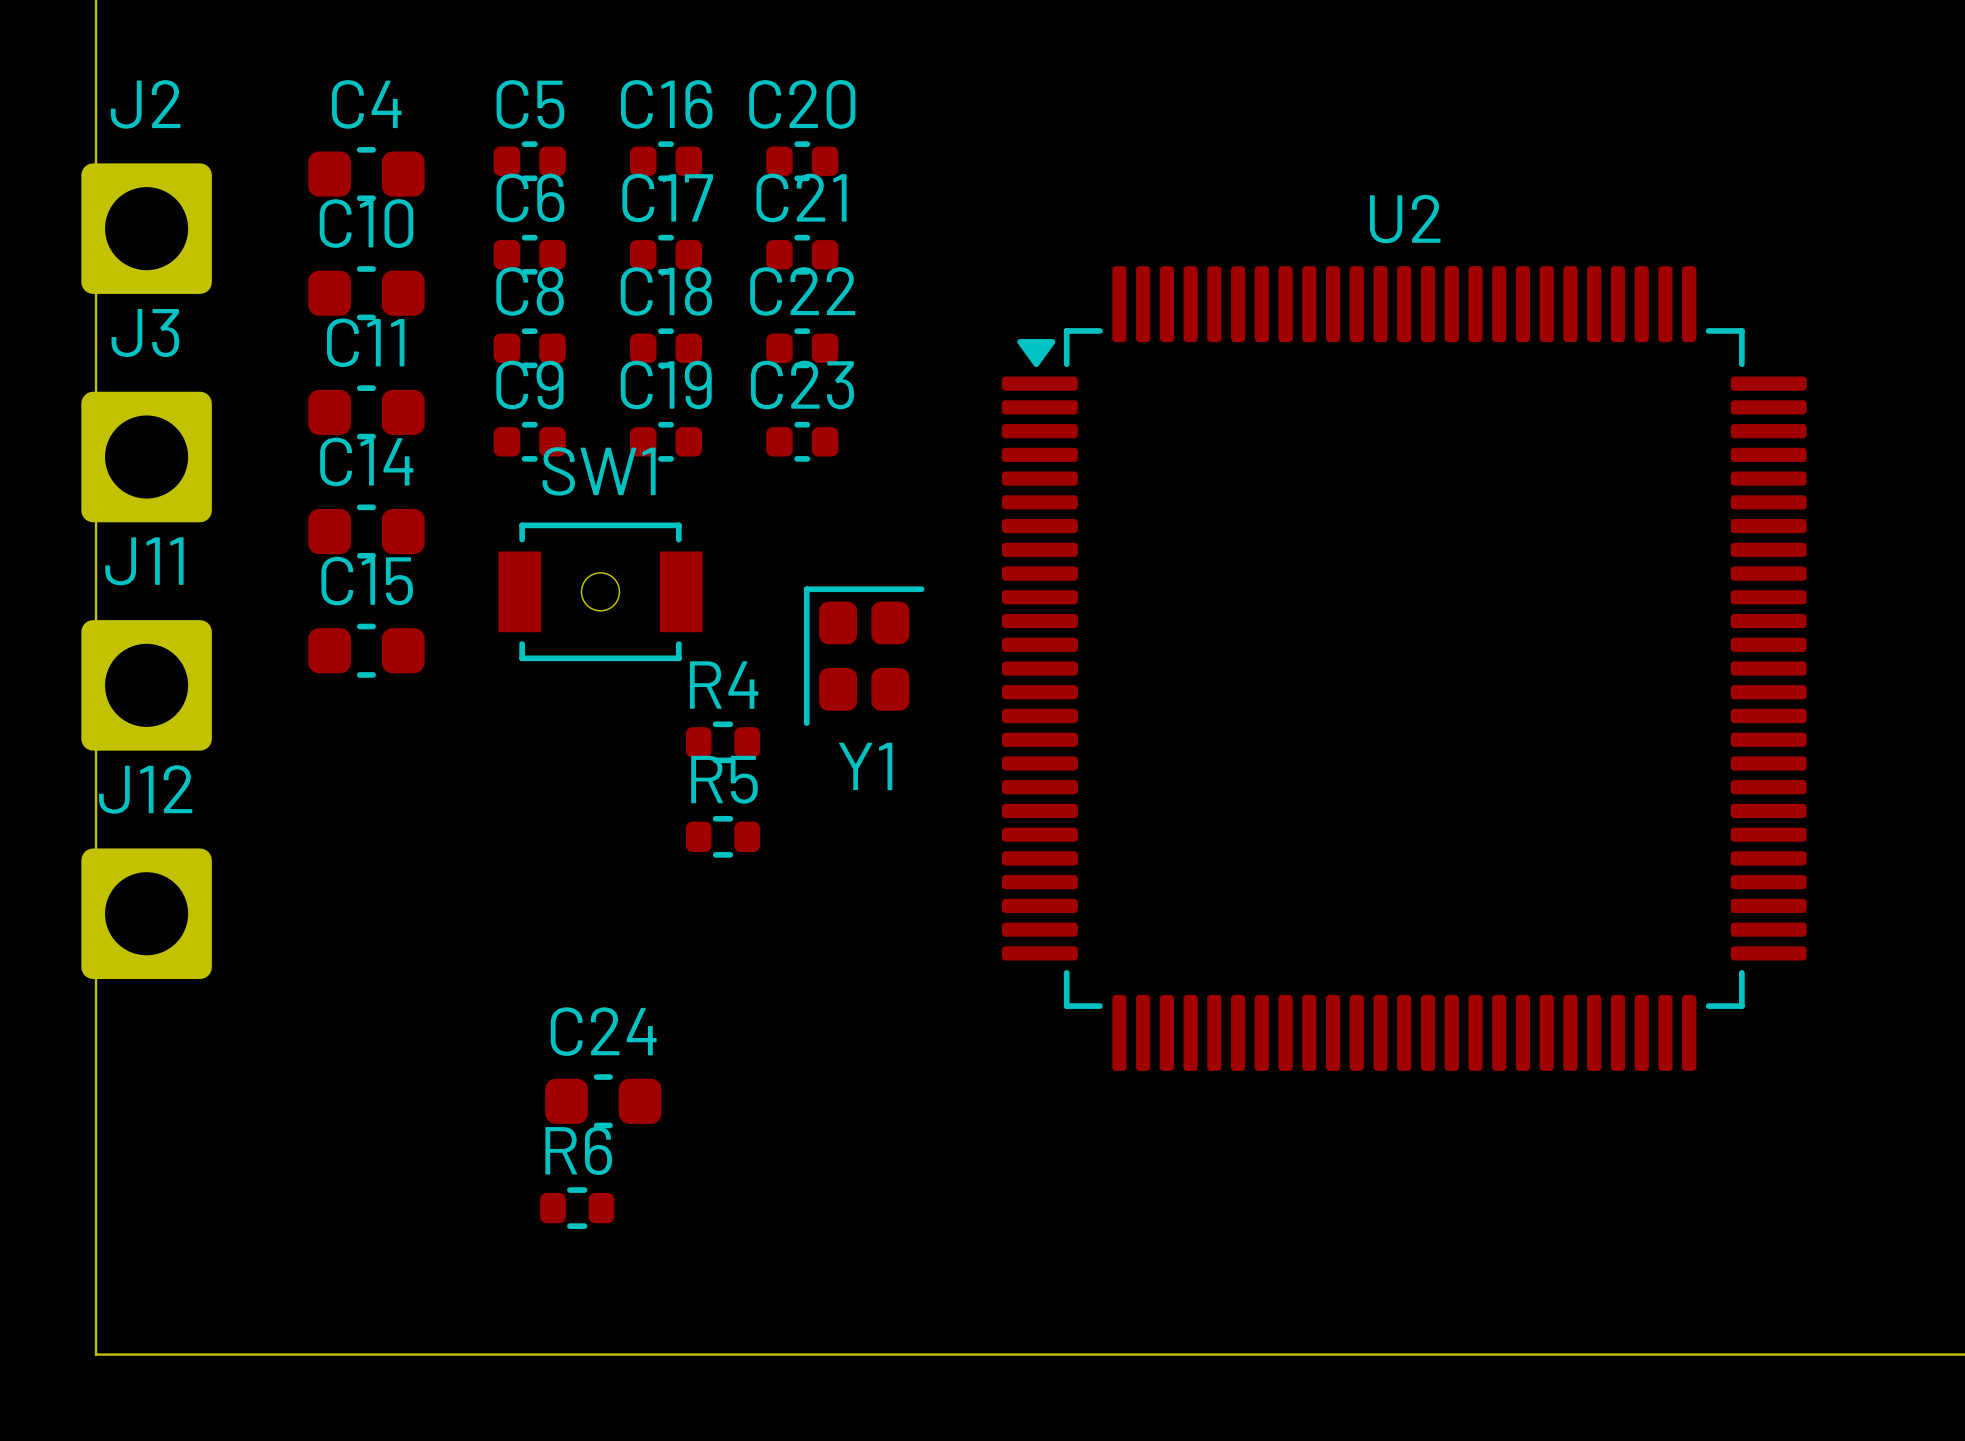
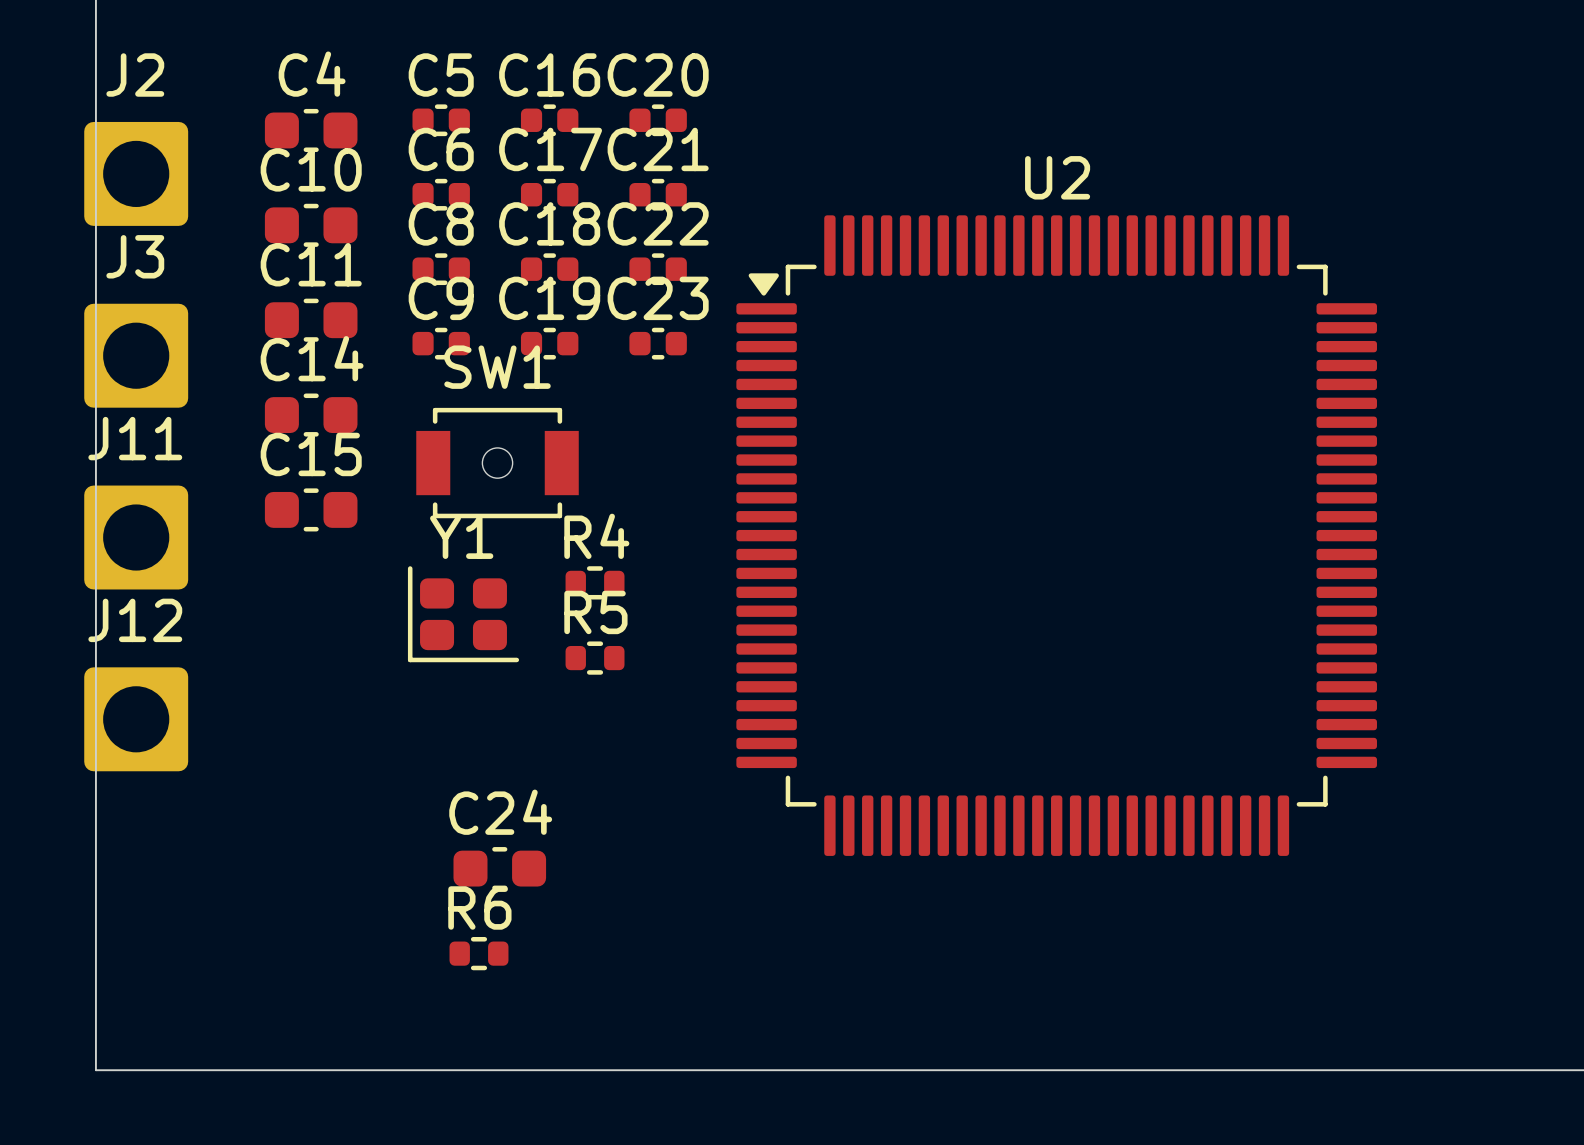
Y1 rotation: 0° (864, 656) -> 90° counterclockwise (463, 614)
Y1 position: (864, 656) -> (463, 614)
U2 position: (1404, 668) -> (1056, 535)
Y1 name position: Y1 (865, 766) -> Y1 (461, 537)

